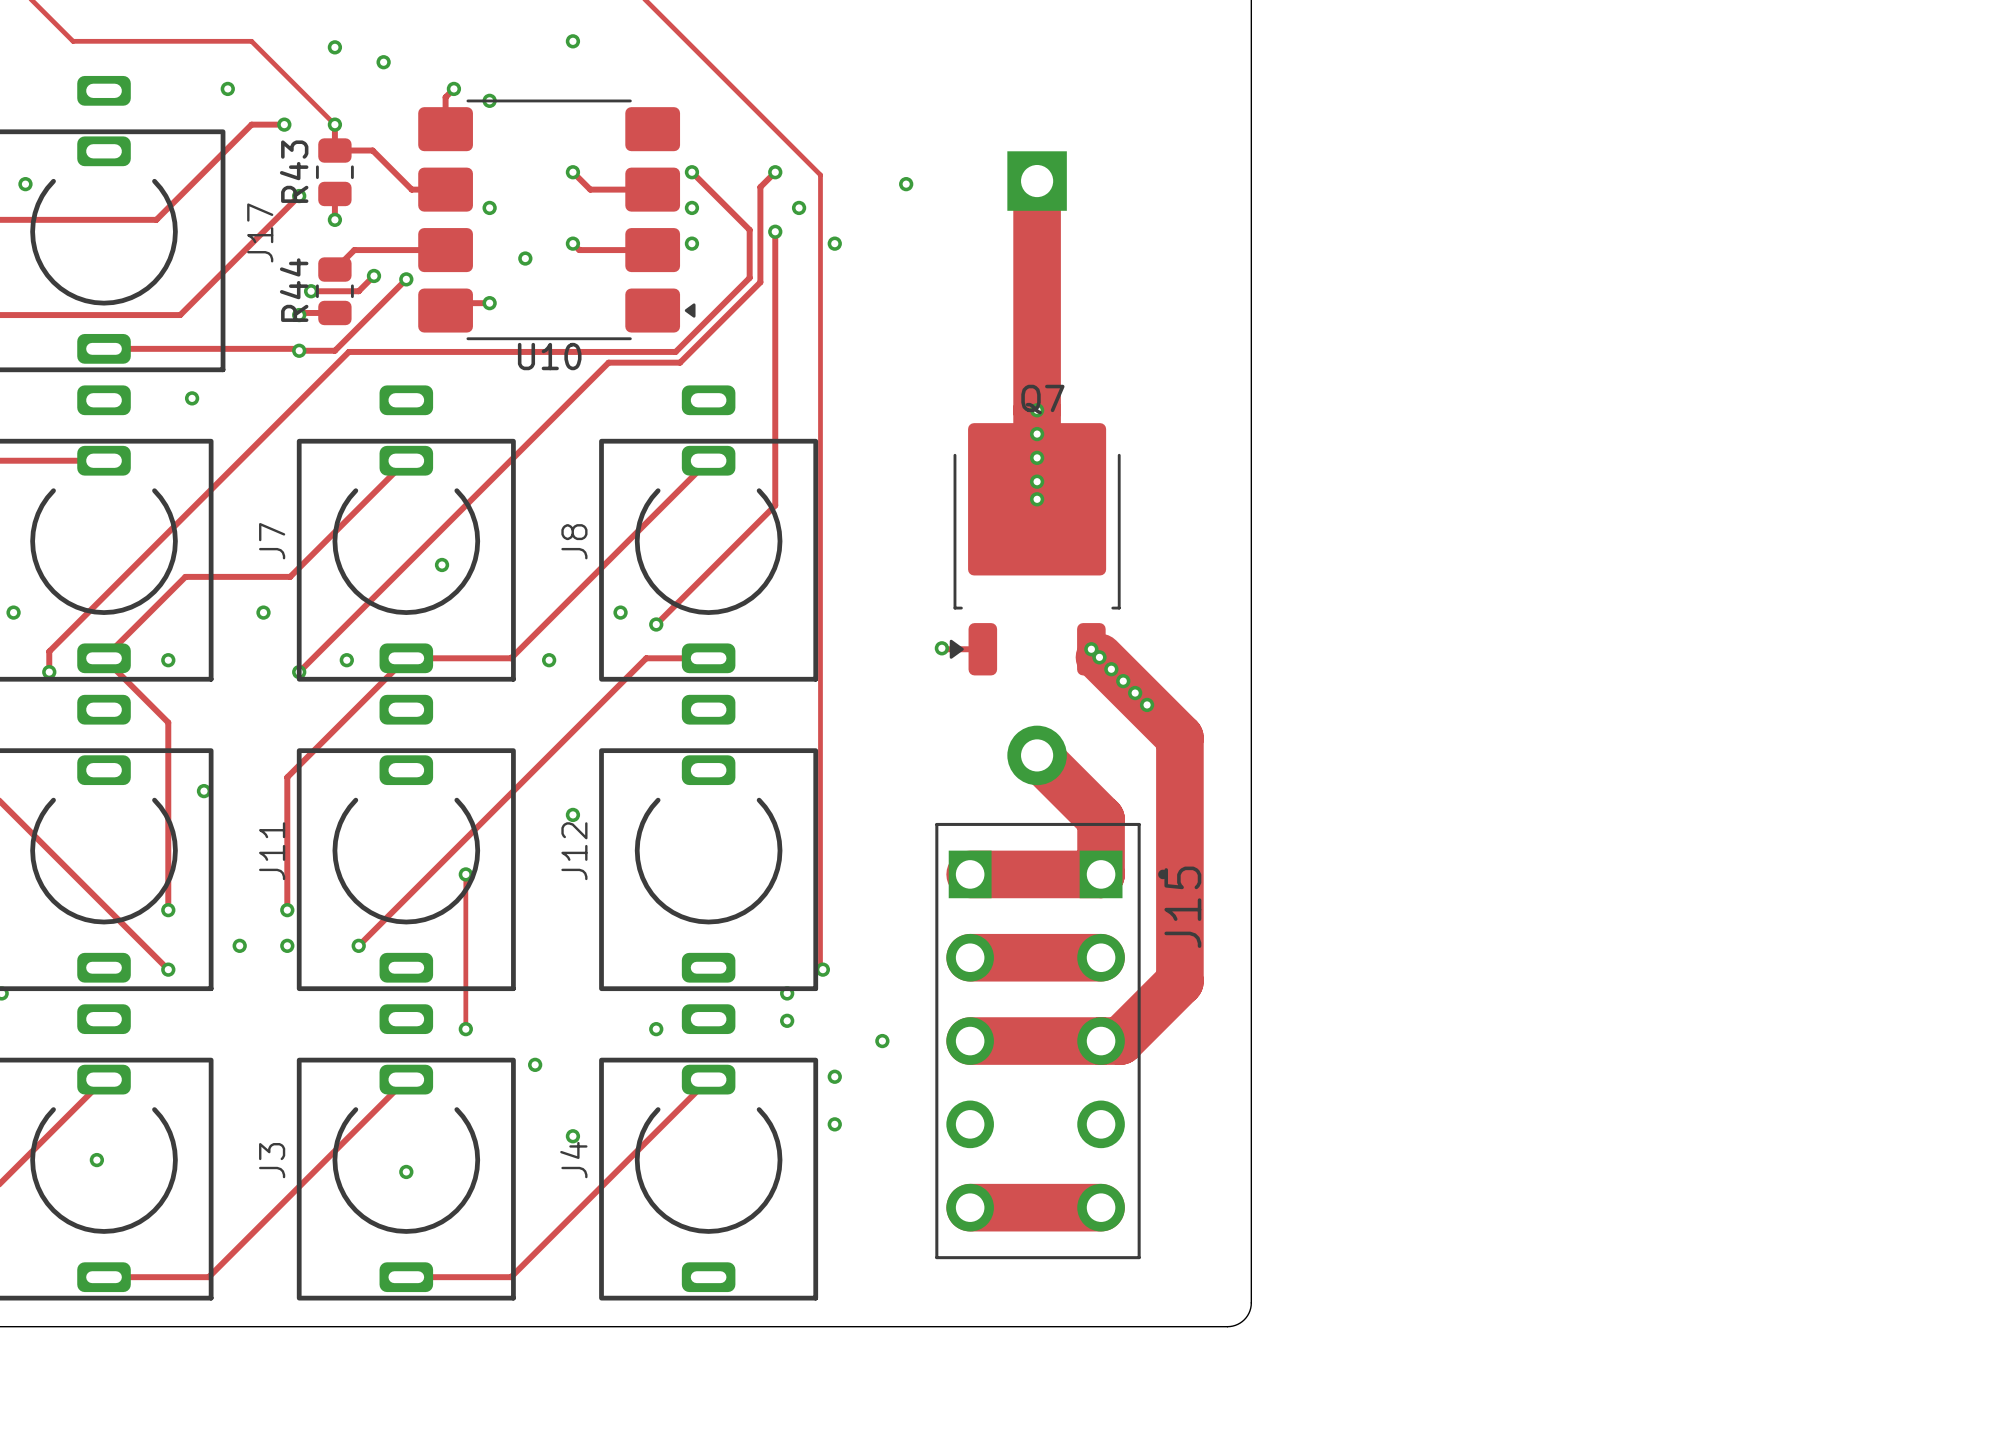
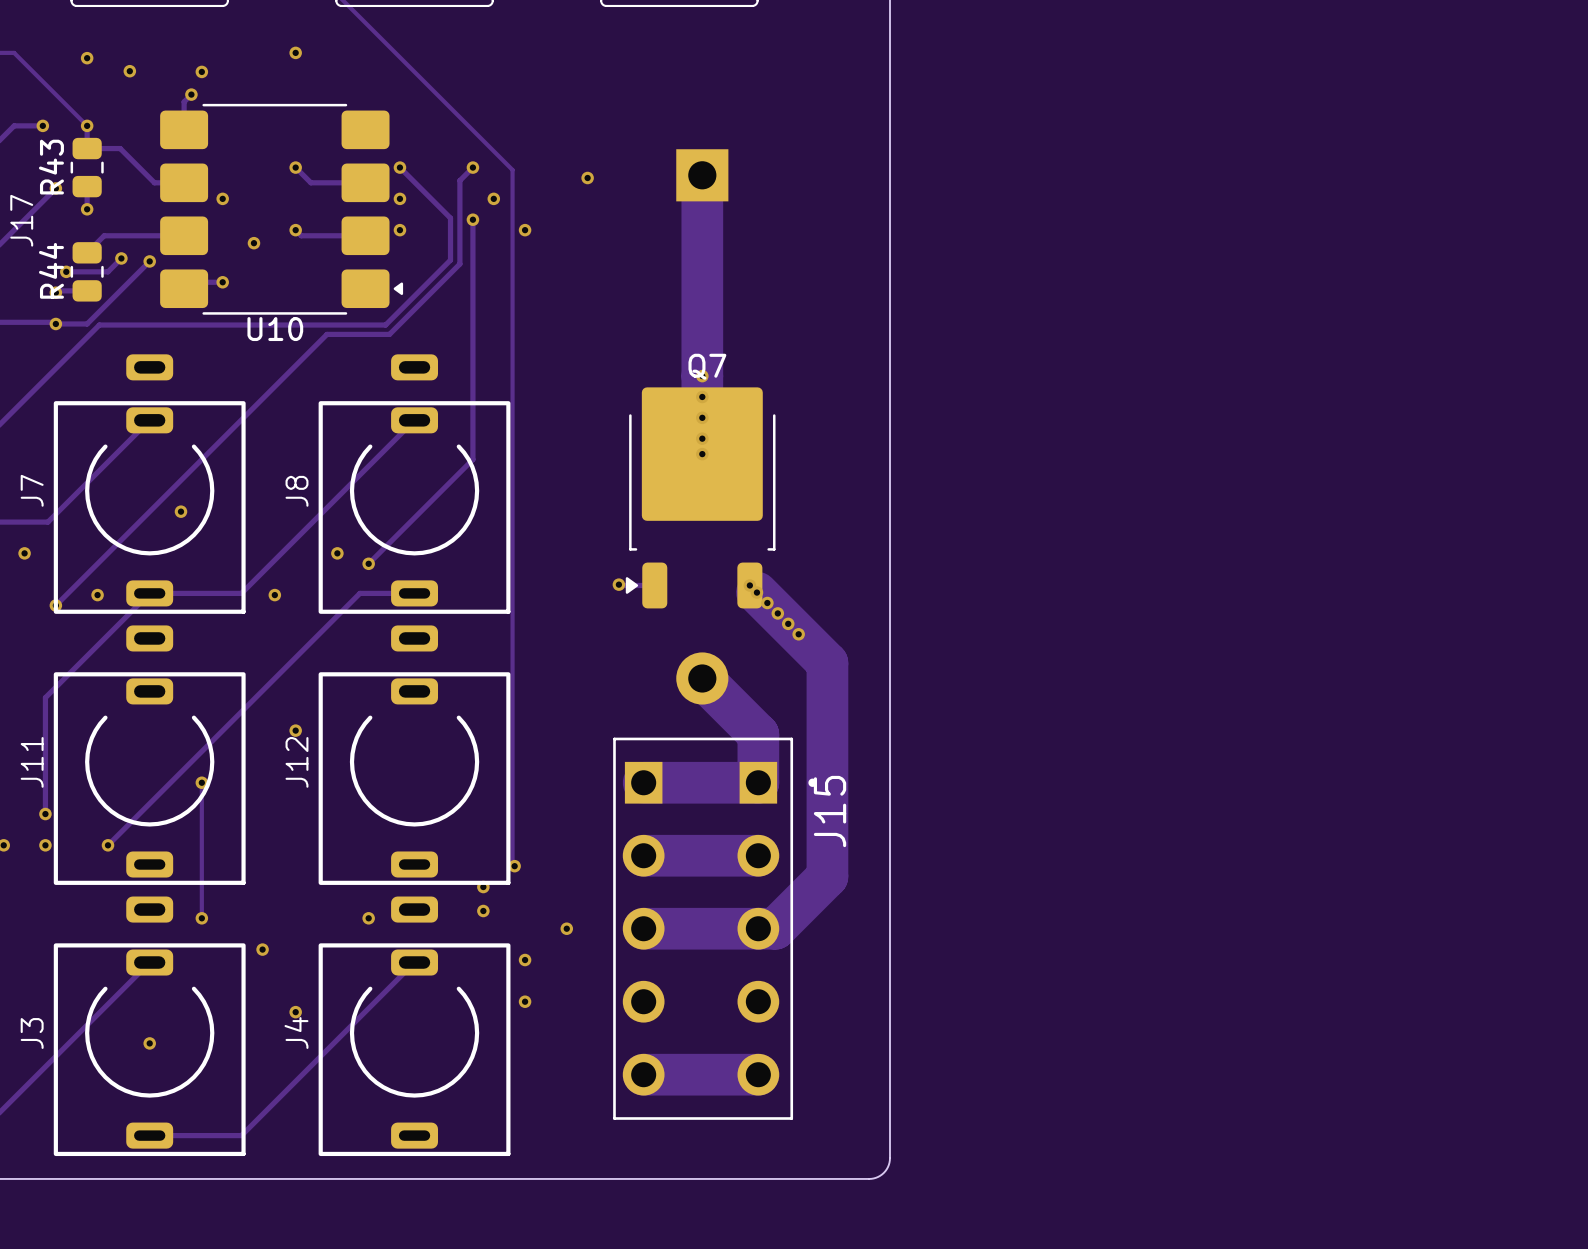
via position: (489, 100) -> (201, 71)

